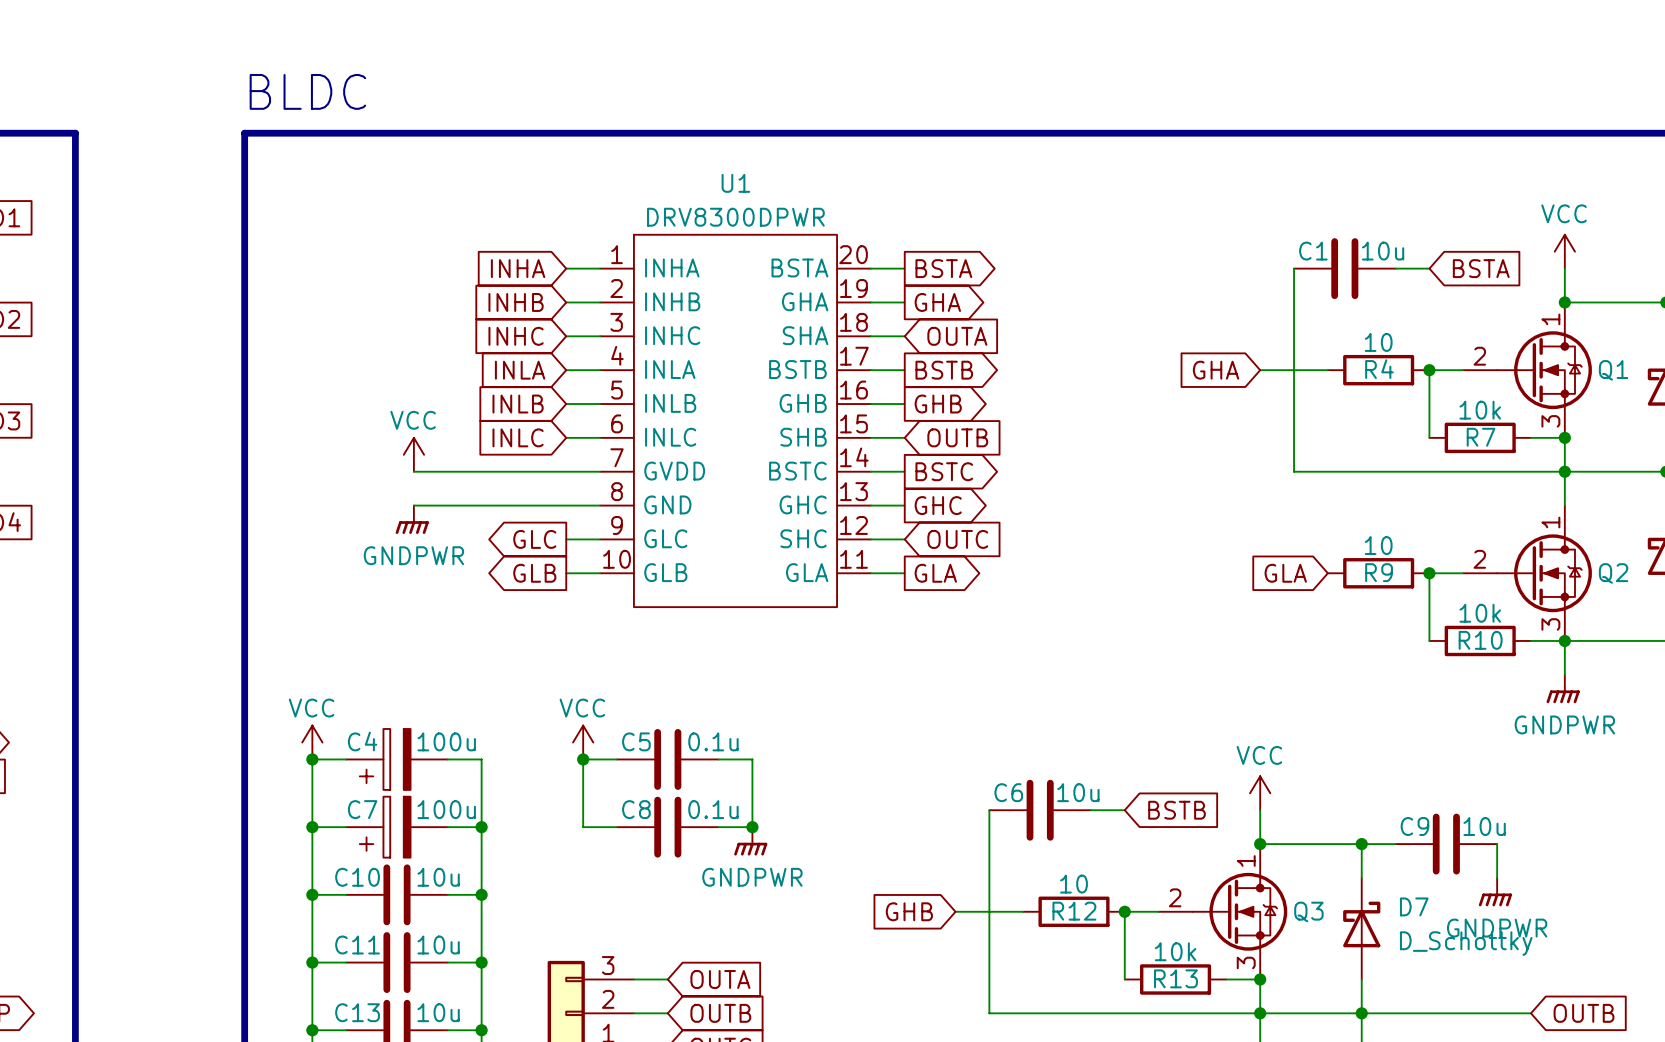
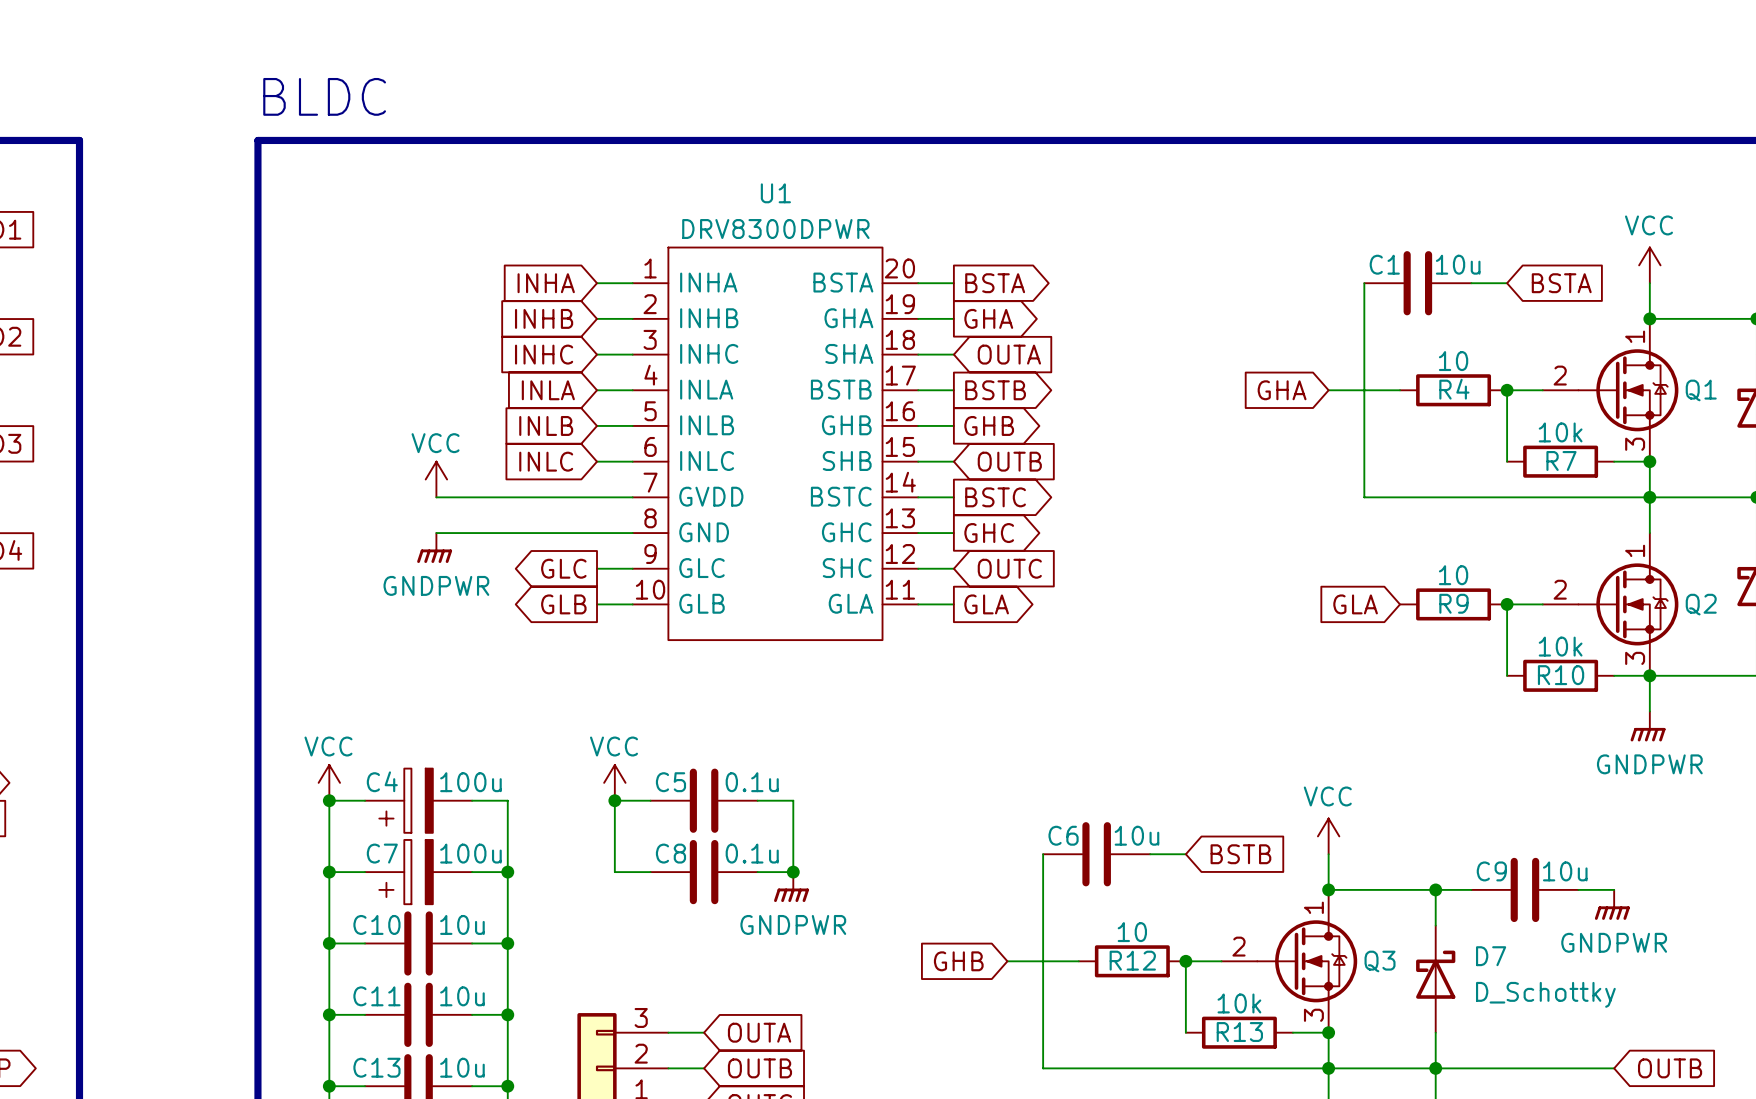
wire: (1497, 844) (1497, 877) -> (1578, 889) (1614, 889)
power symbol position: GNDPWR (1495, 892) -> GNDPWR (1612, 904)

